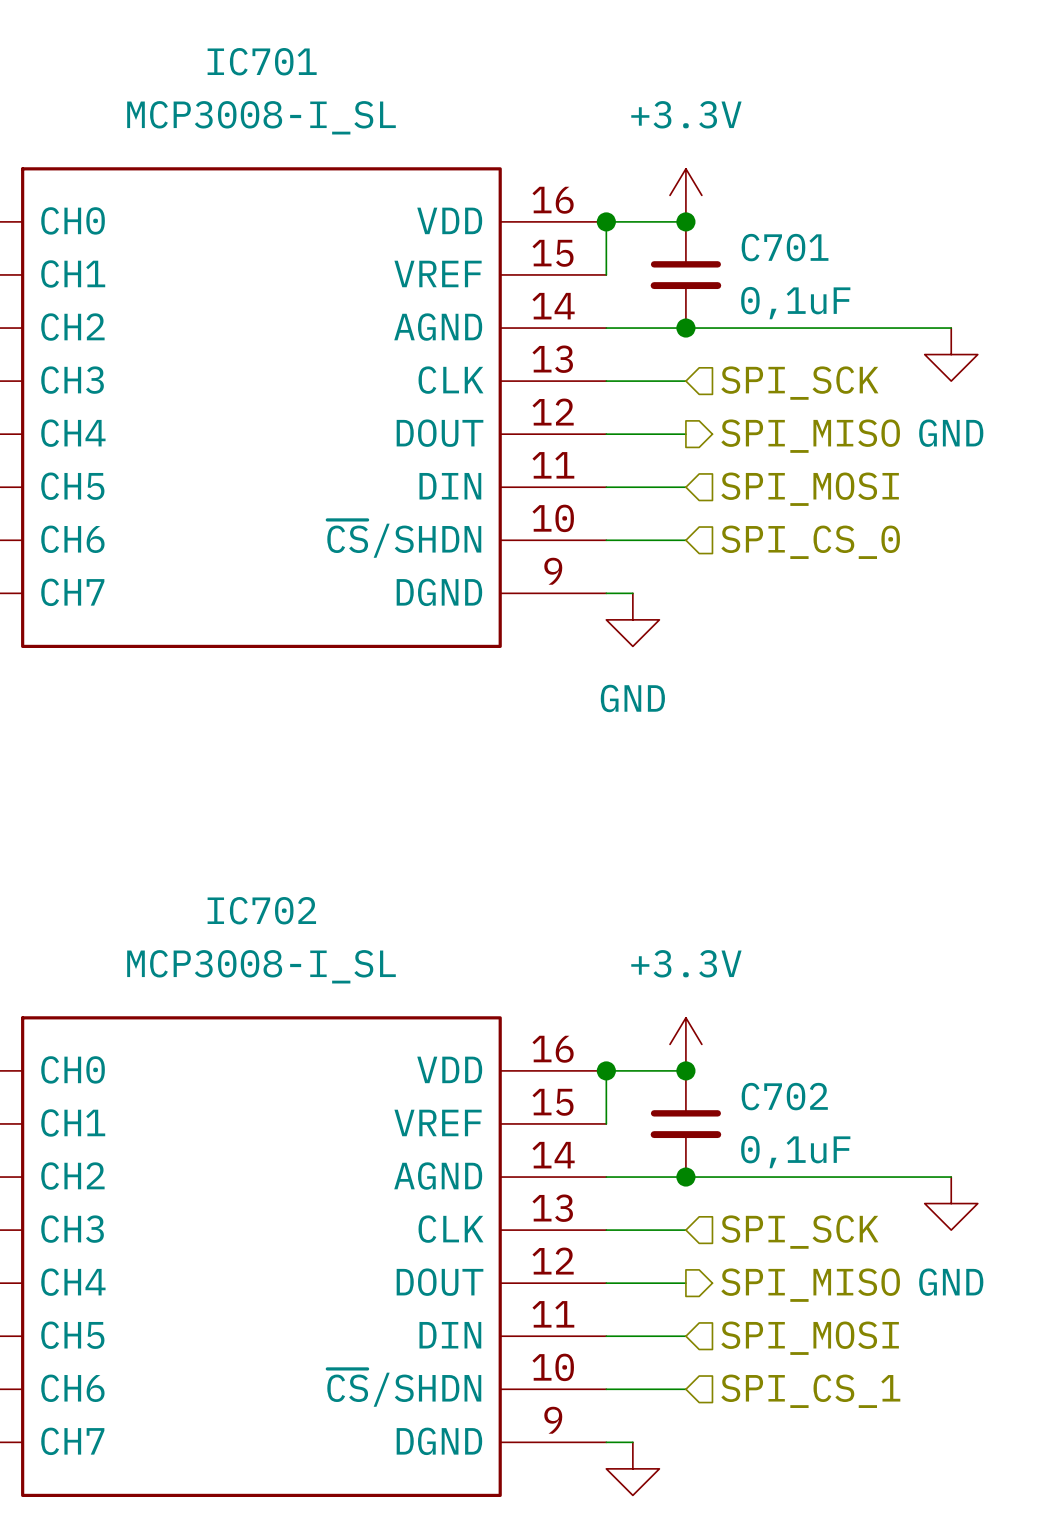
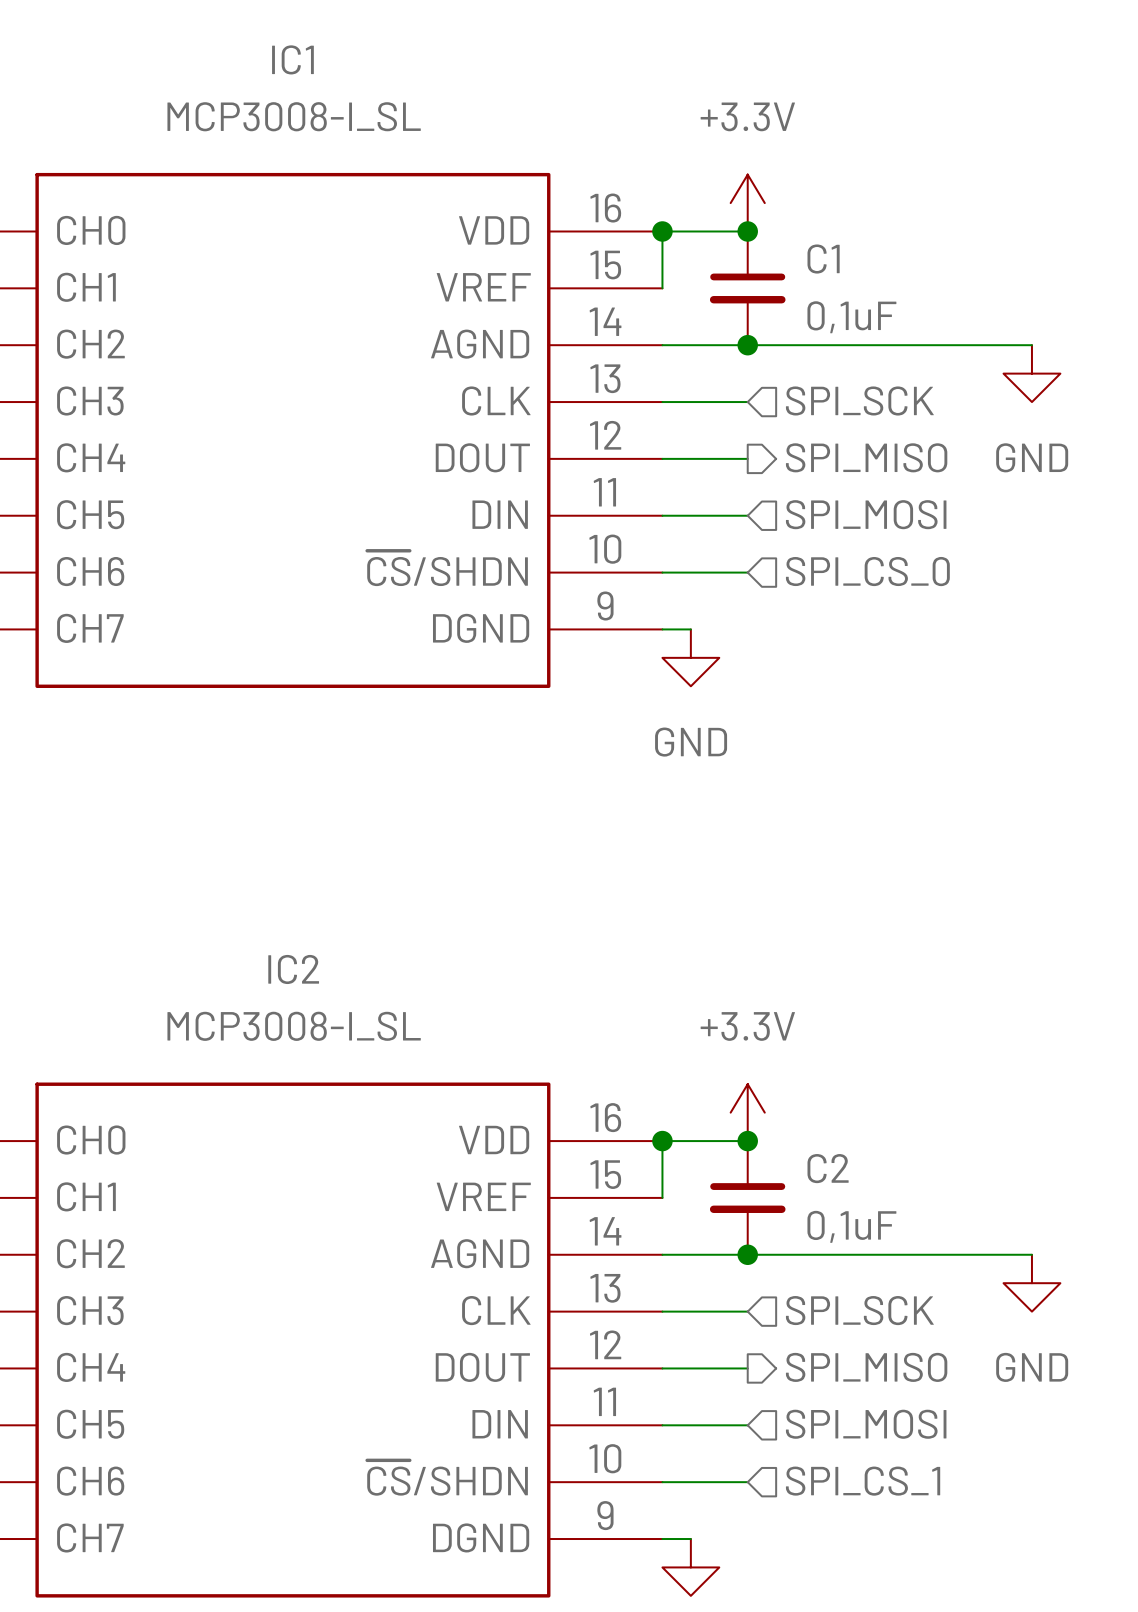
IC701 name: IC701 (262, 61) -> IC1 (292, 59)
C701 name: C701 (785, 247) -> C1 (823, 259)
IC702 name: IC702 (261, 910) -> IC2 (293, 969)
C702 name: C702 (784, 1096) -> C2 (828, 1168)

